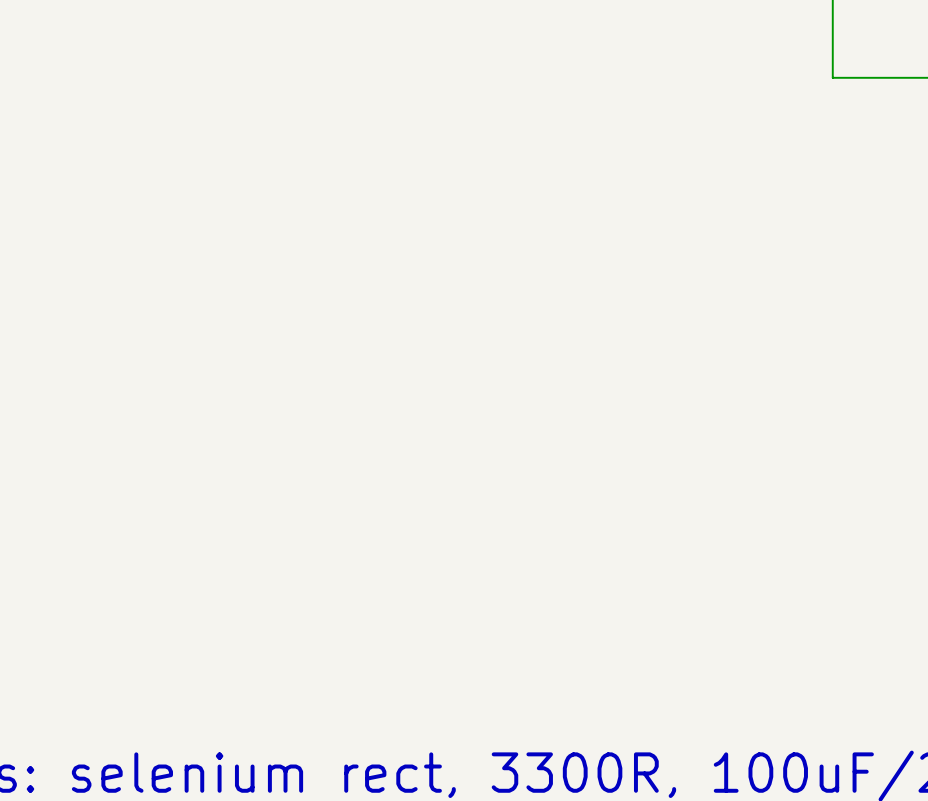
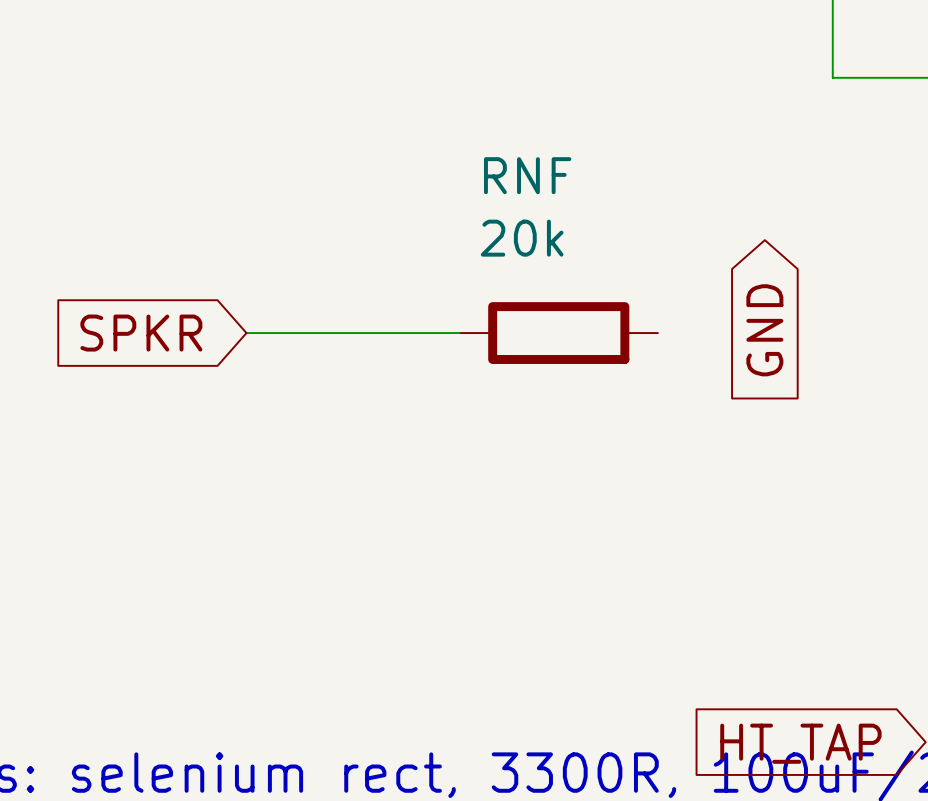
global label: none -> GND (764, 330)
global label: none -> SPKR (141, 333)
wire: none -> (246, 333) (459, 333)
RNF: none -> 20k (558, 333)
global label: none -> HT_TAP (800, 743)

